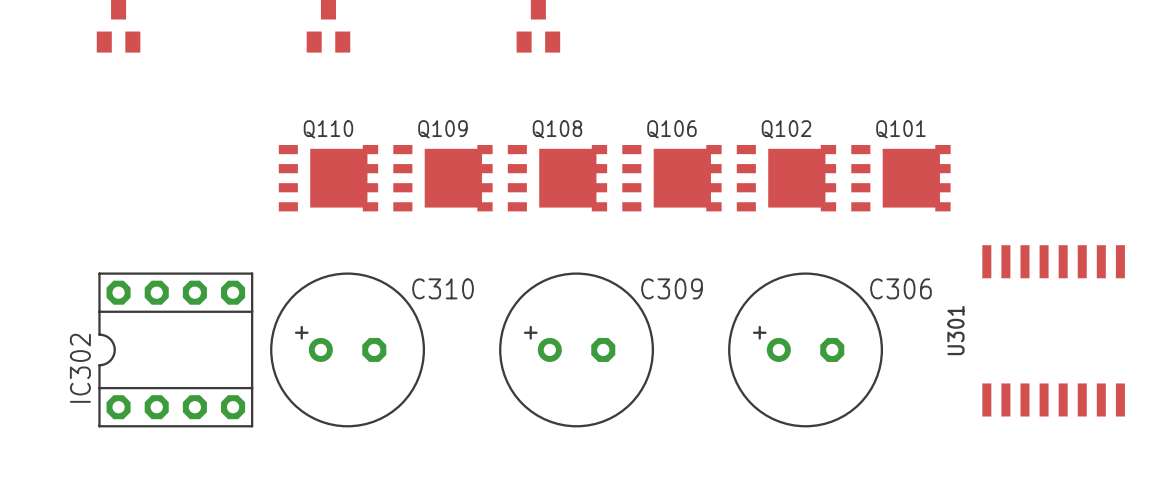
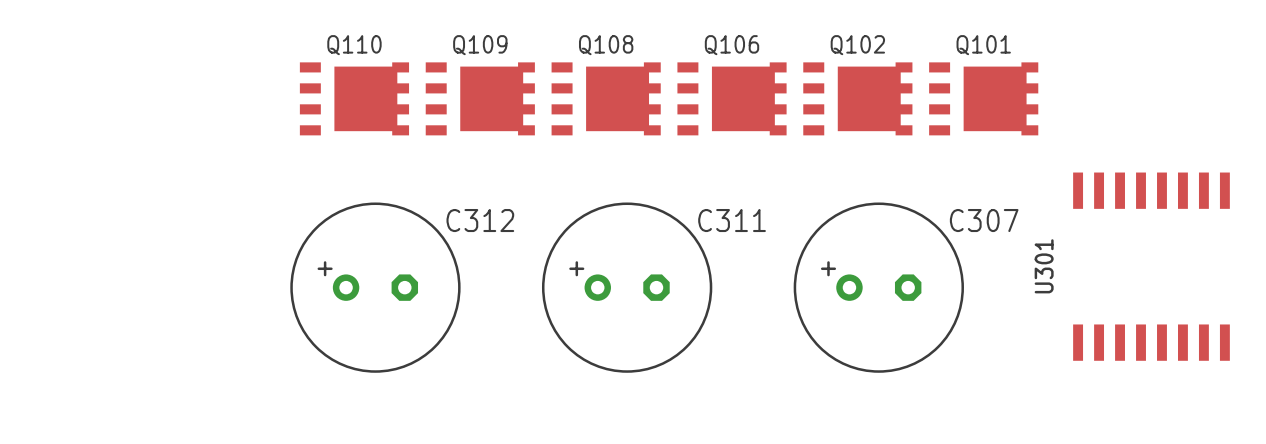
C310 name: C310 (443, 288) -> C312 (480, 220)
C309 name: C309 (671, 288) -> C311 (732, 220)
C306 name: C306 (900, 288) -> C307 (984, 220)
IC302: (175, 349) -> none

